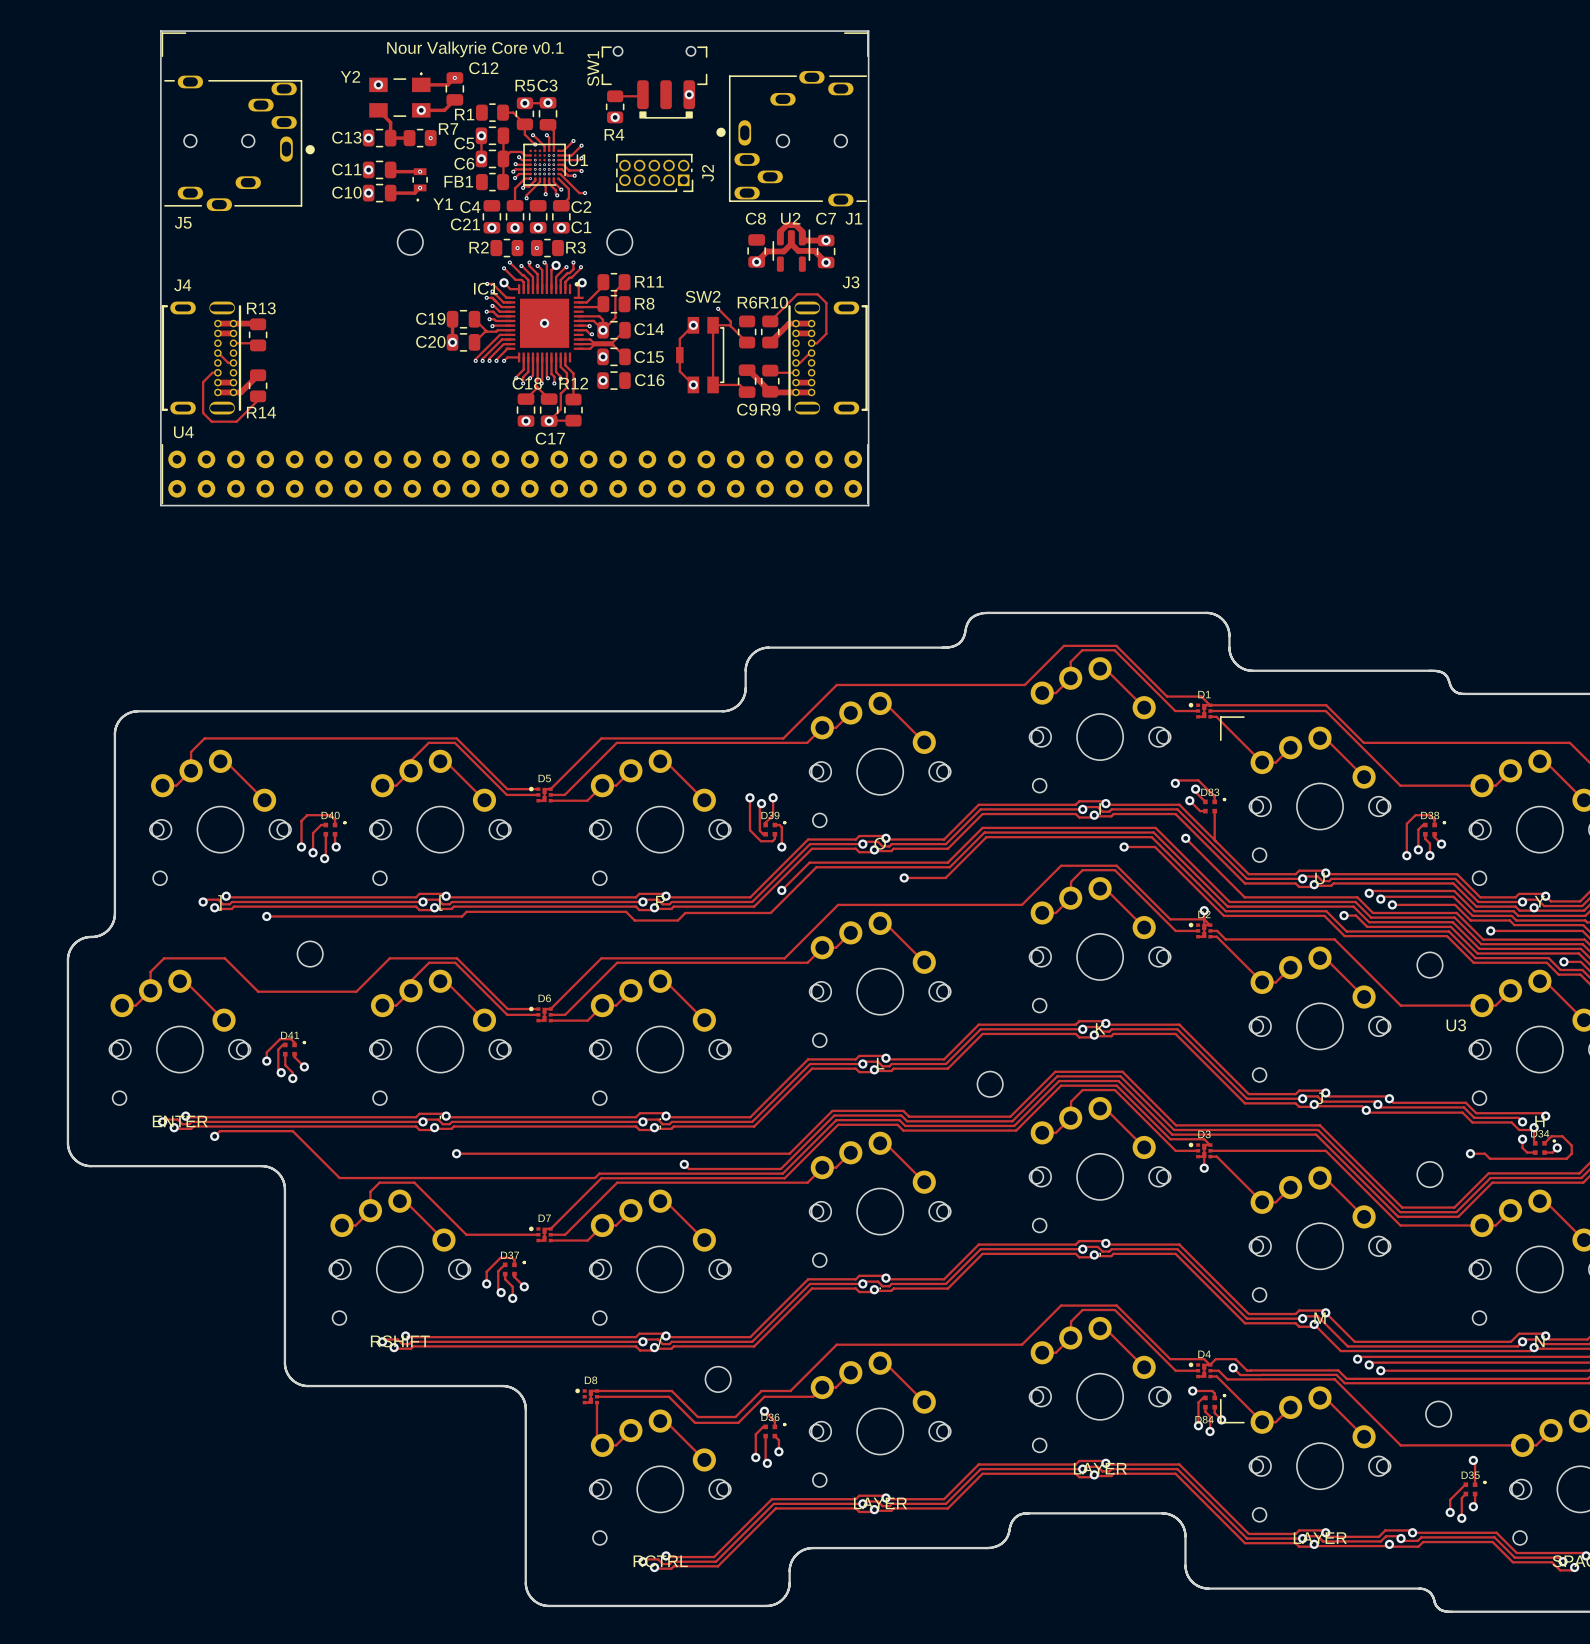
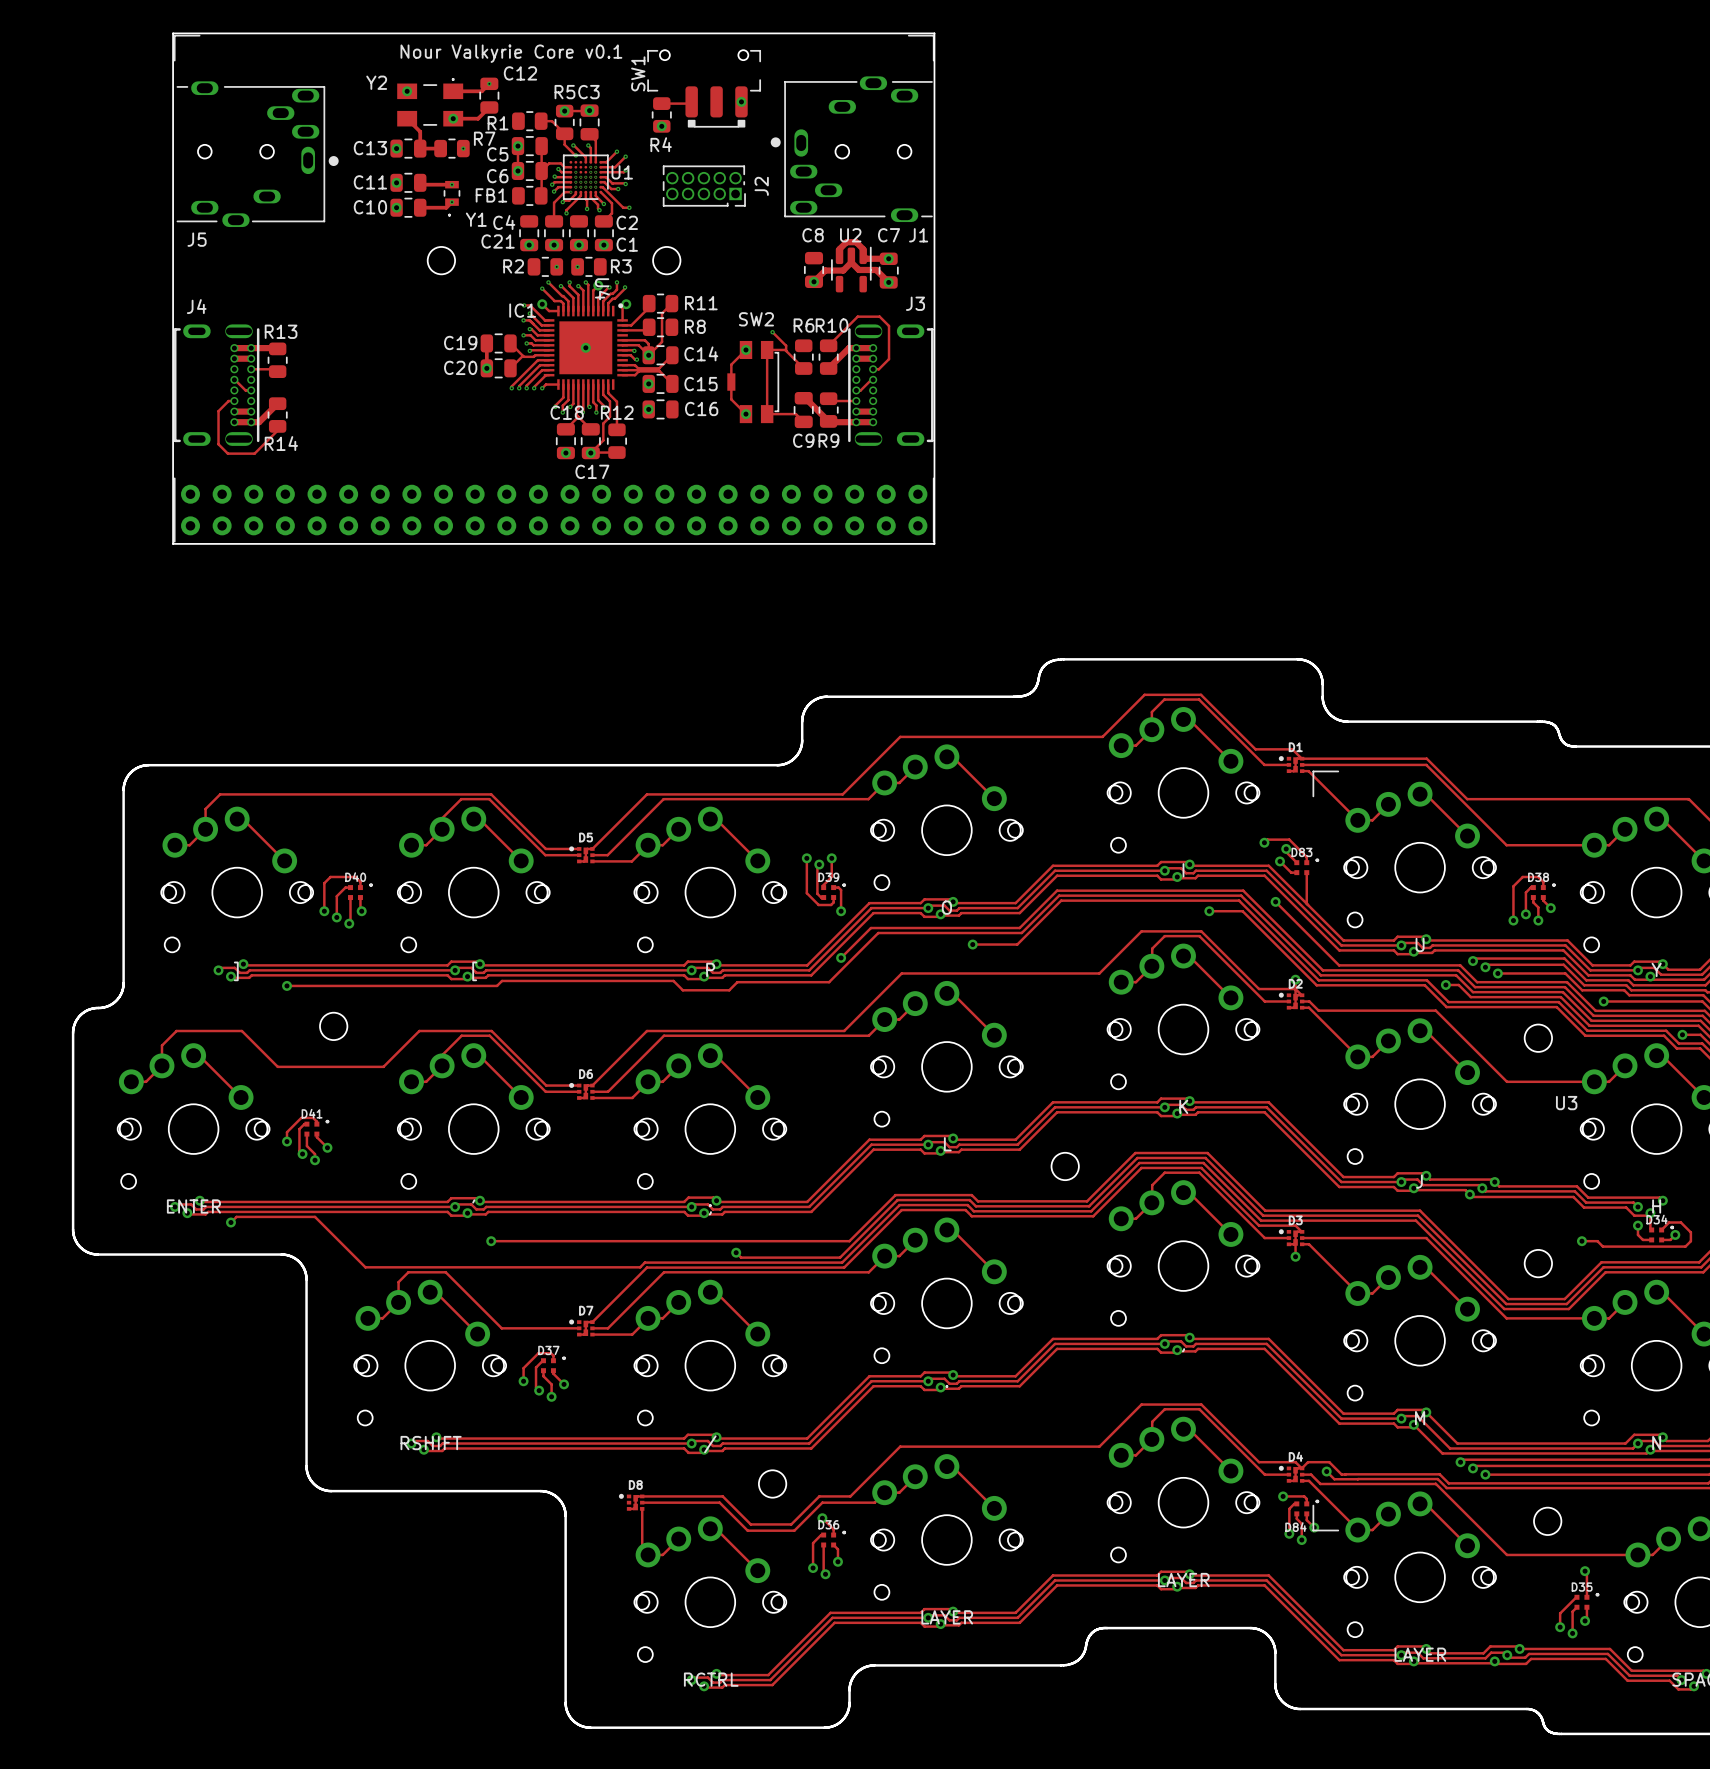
U4 name rotation: 0° (183, 432) -> 90° clockwise (602, 289)
U4 name position: U4 (183, 432) -> U4 (602, 289)

